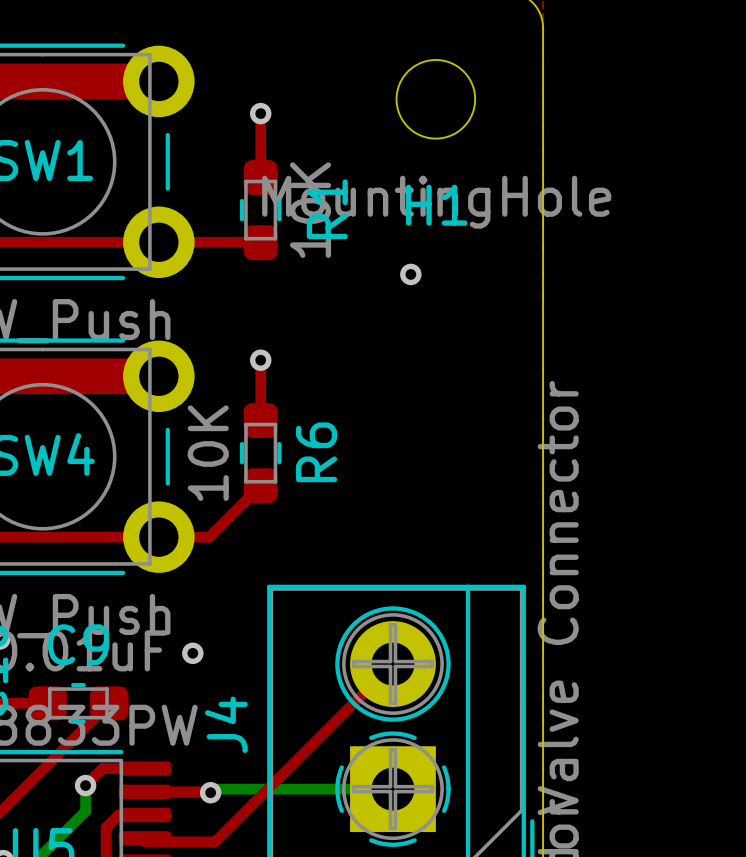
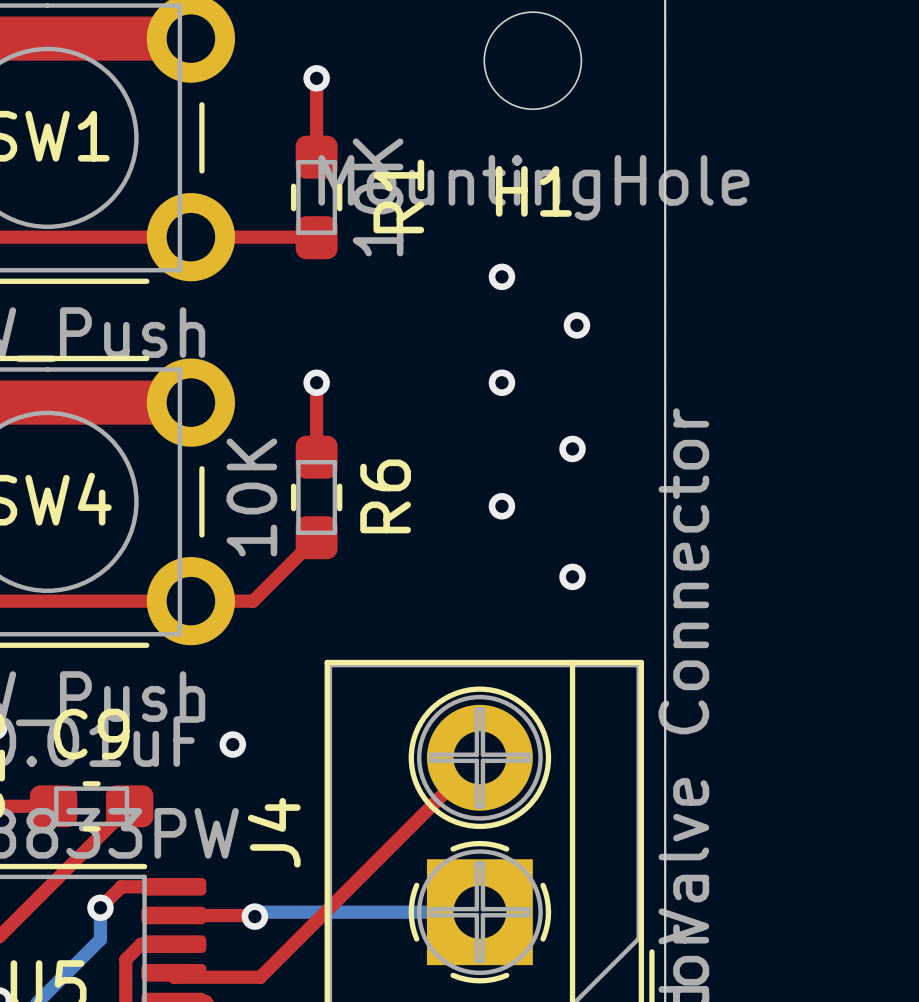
via: none -> (576, 325)
via: none -> (501, 382)
via: none -> (572, 448)
via: none -> (501, 506)
via: none -> (572, 576)

